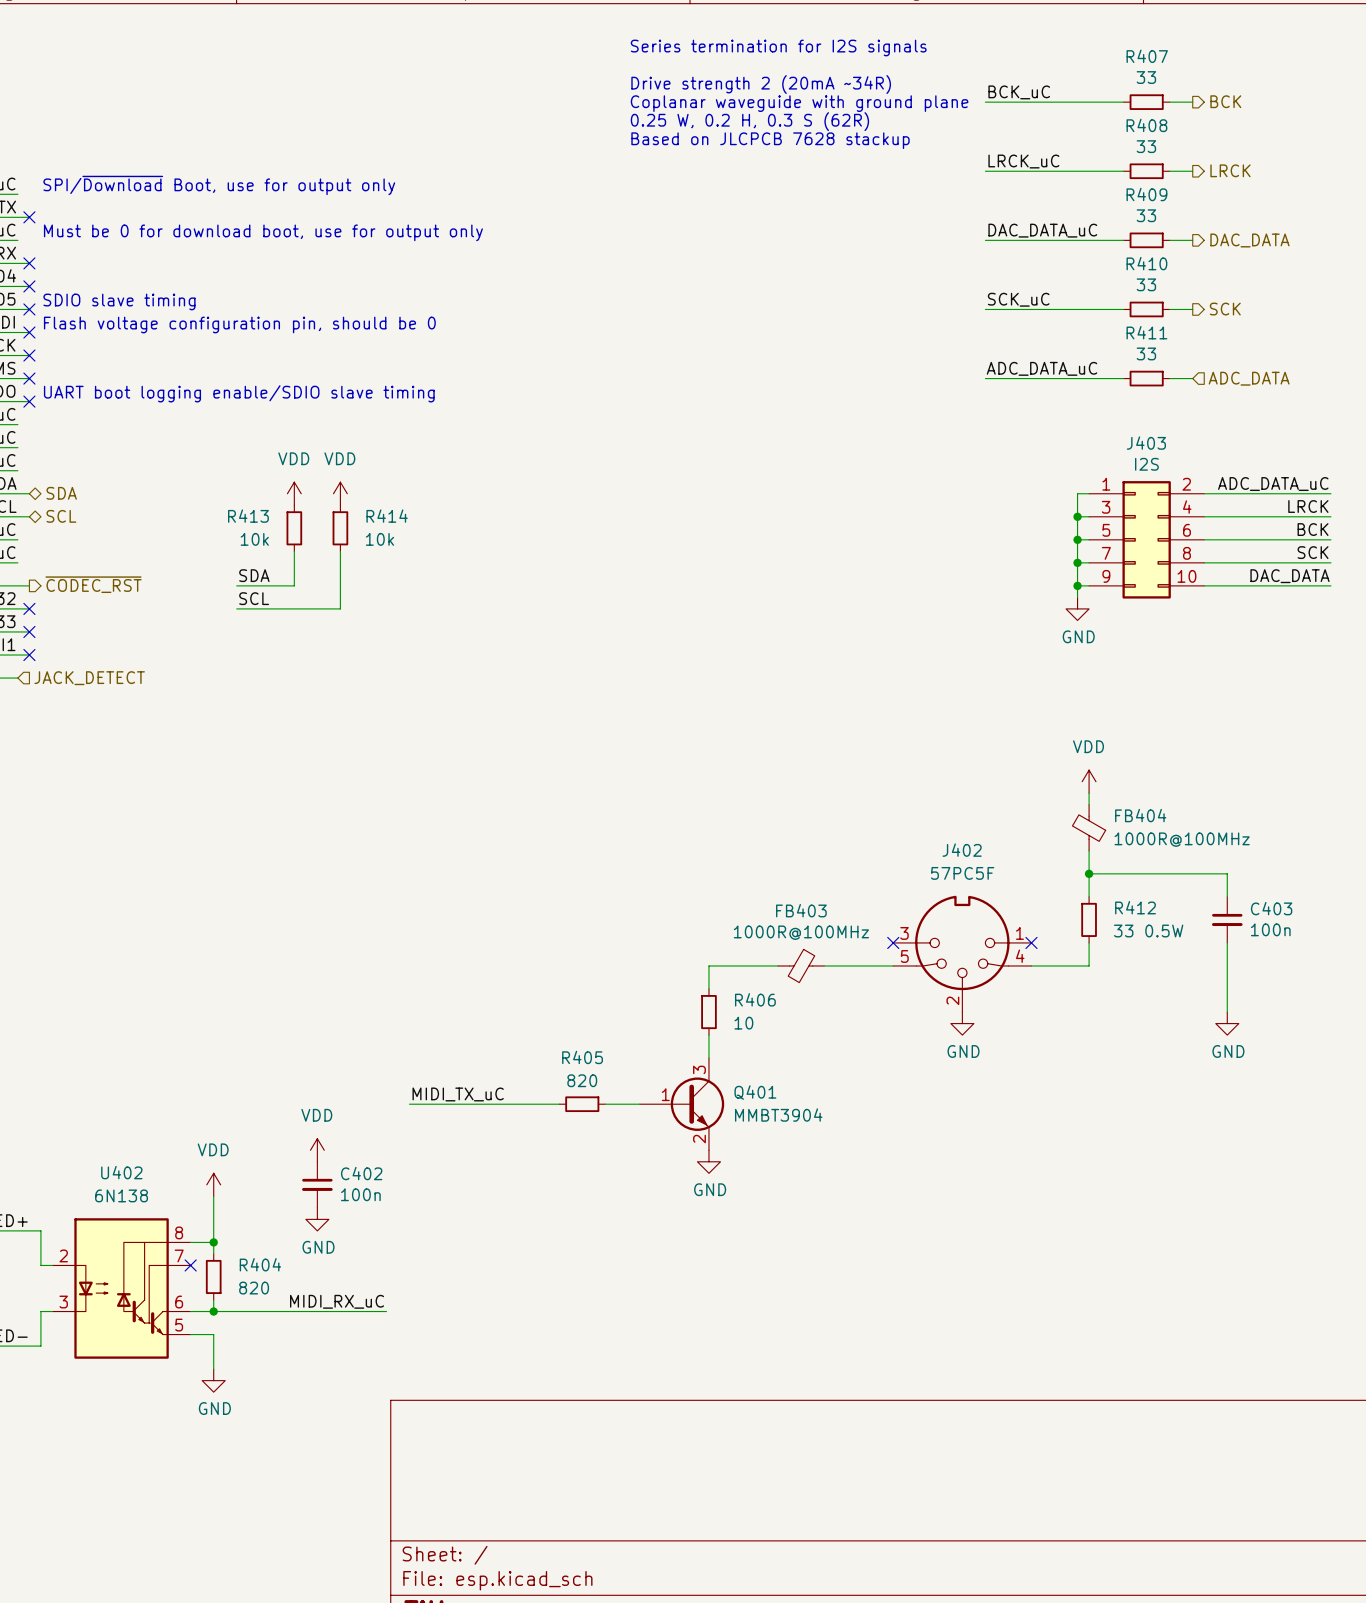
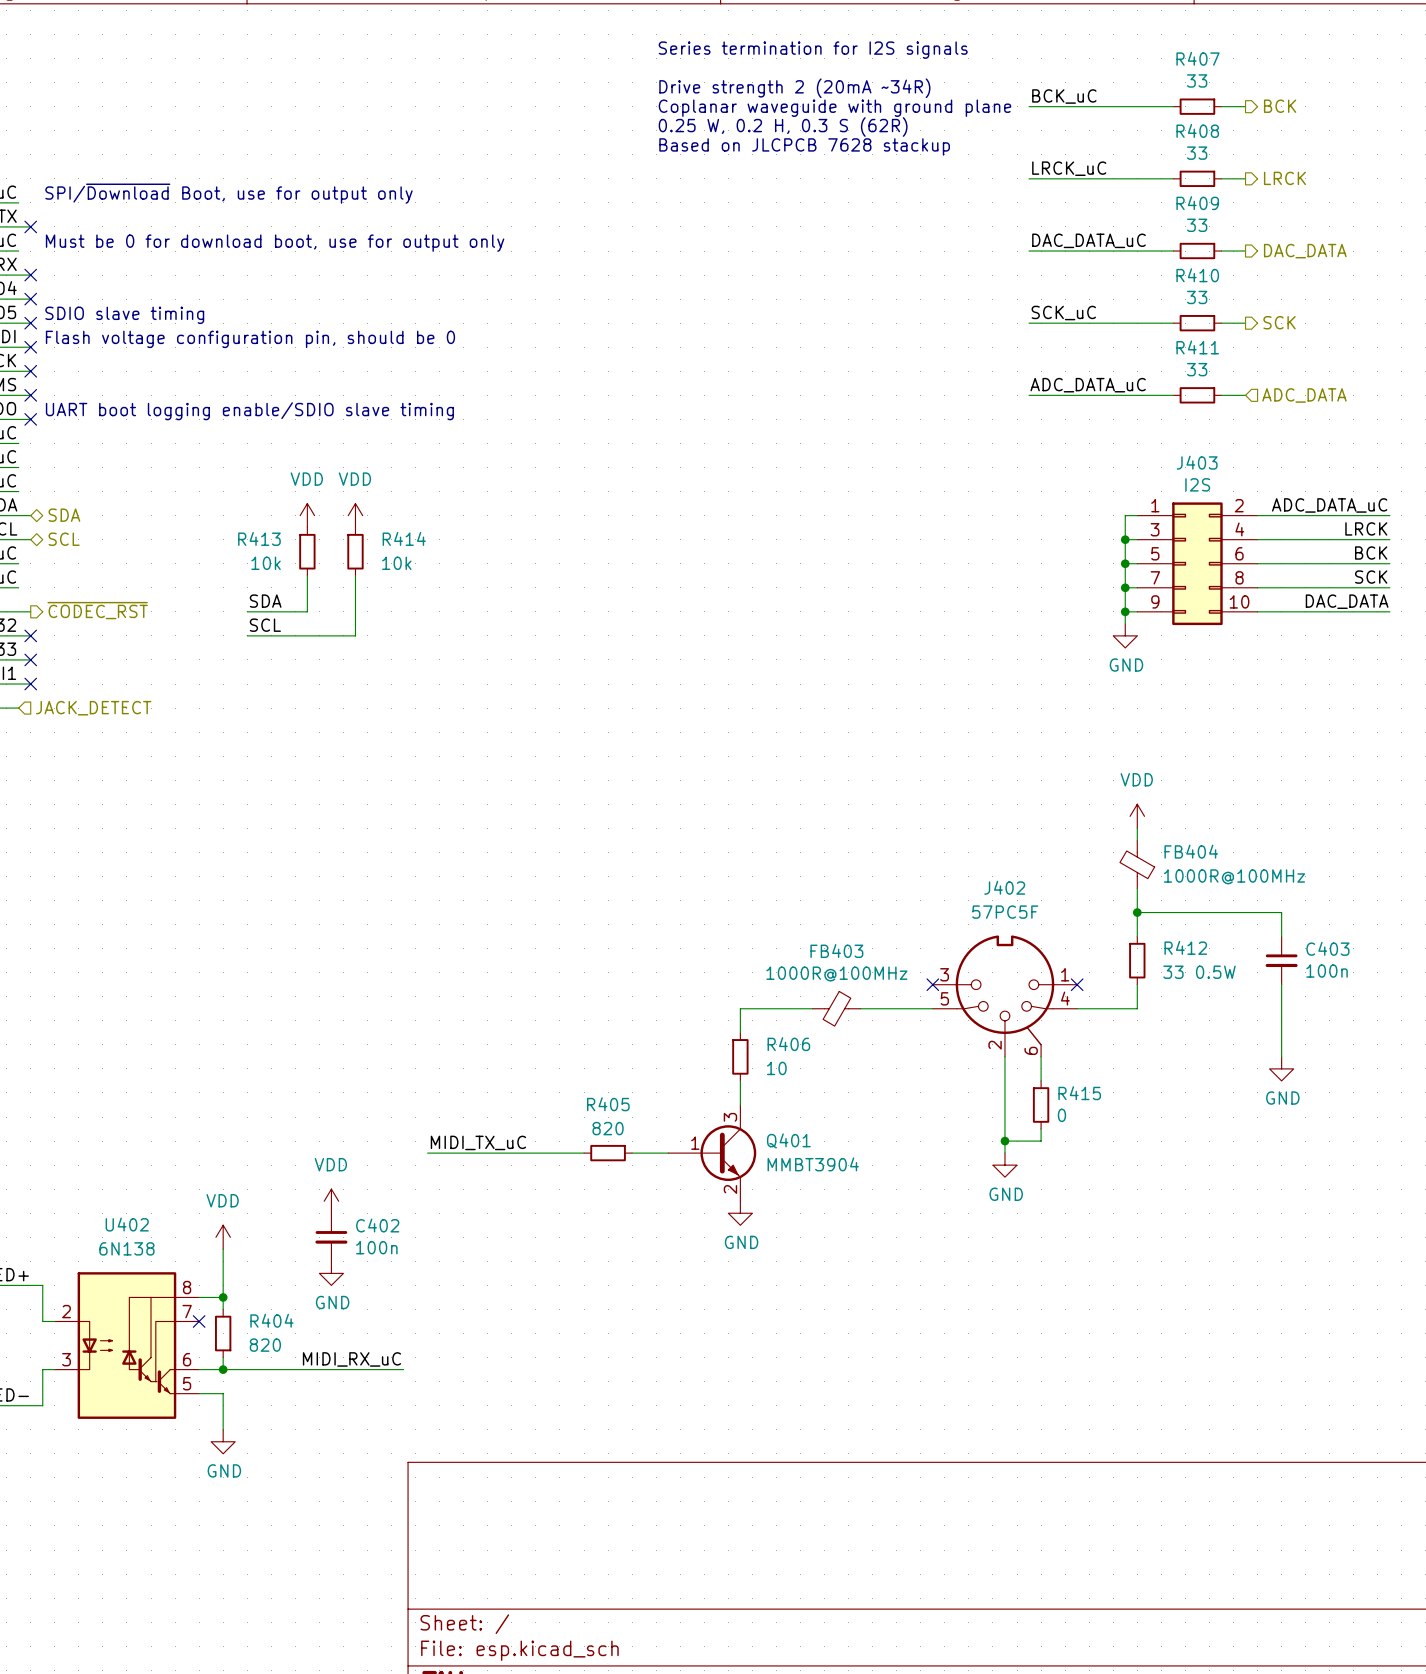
J402 symbol: [893, 895, 1032, 1013] -> [932, 935, 1078, 1057]
wire: none -> (1004, 1056) (1004, 1153)
wire: none -> (1041, 1056) (1041, 1080)
power symbol position: GND (962, 1023) -> GND (1004, 1165)
R415: none -> 0 (1041, 1104)
wire: none -> (1041, 1129) (1041, 1141) (1004, 1141)
junction: none -> (1004, 1141)

